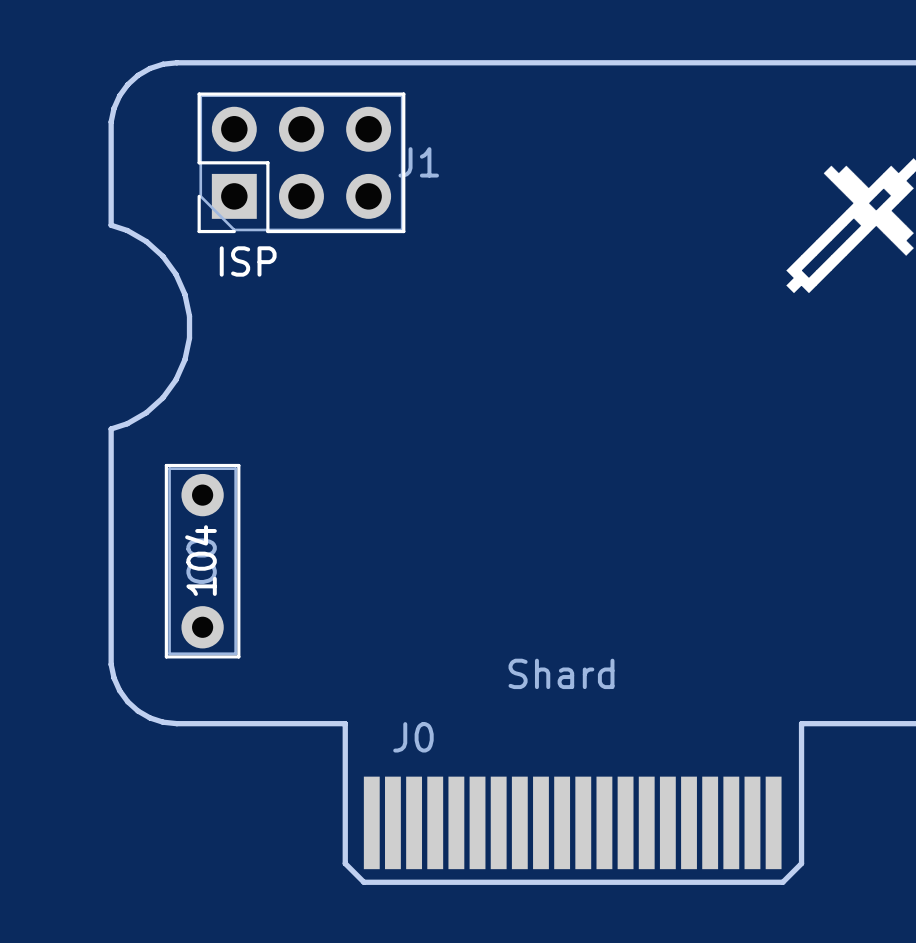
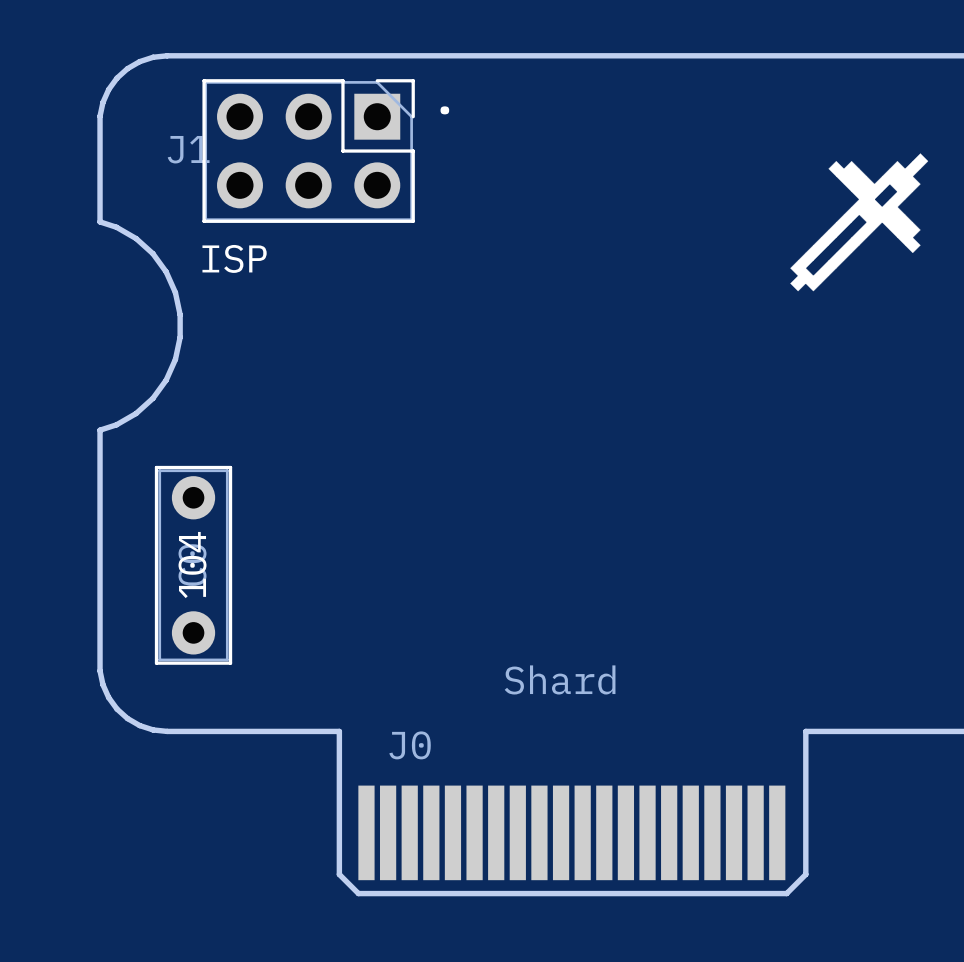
text: none -> . (444, 110)
J1 rotation: 0° (301, 162) -> 180° (308, 151)

